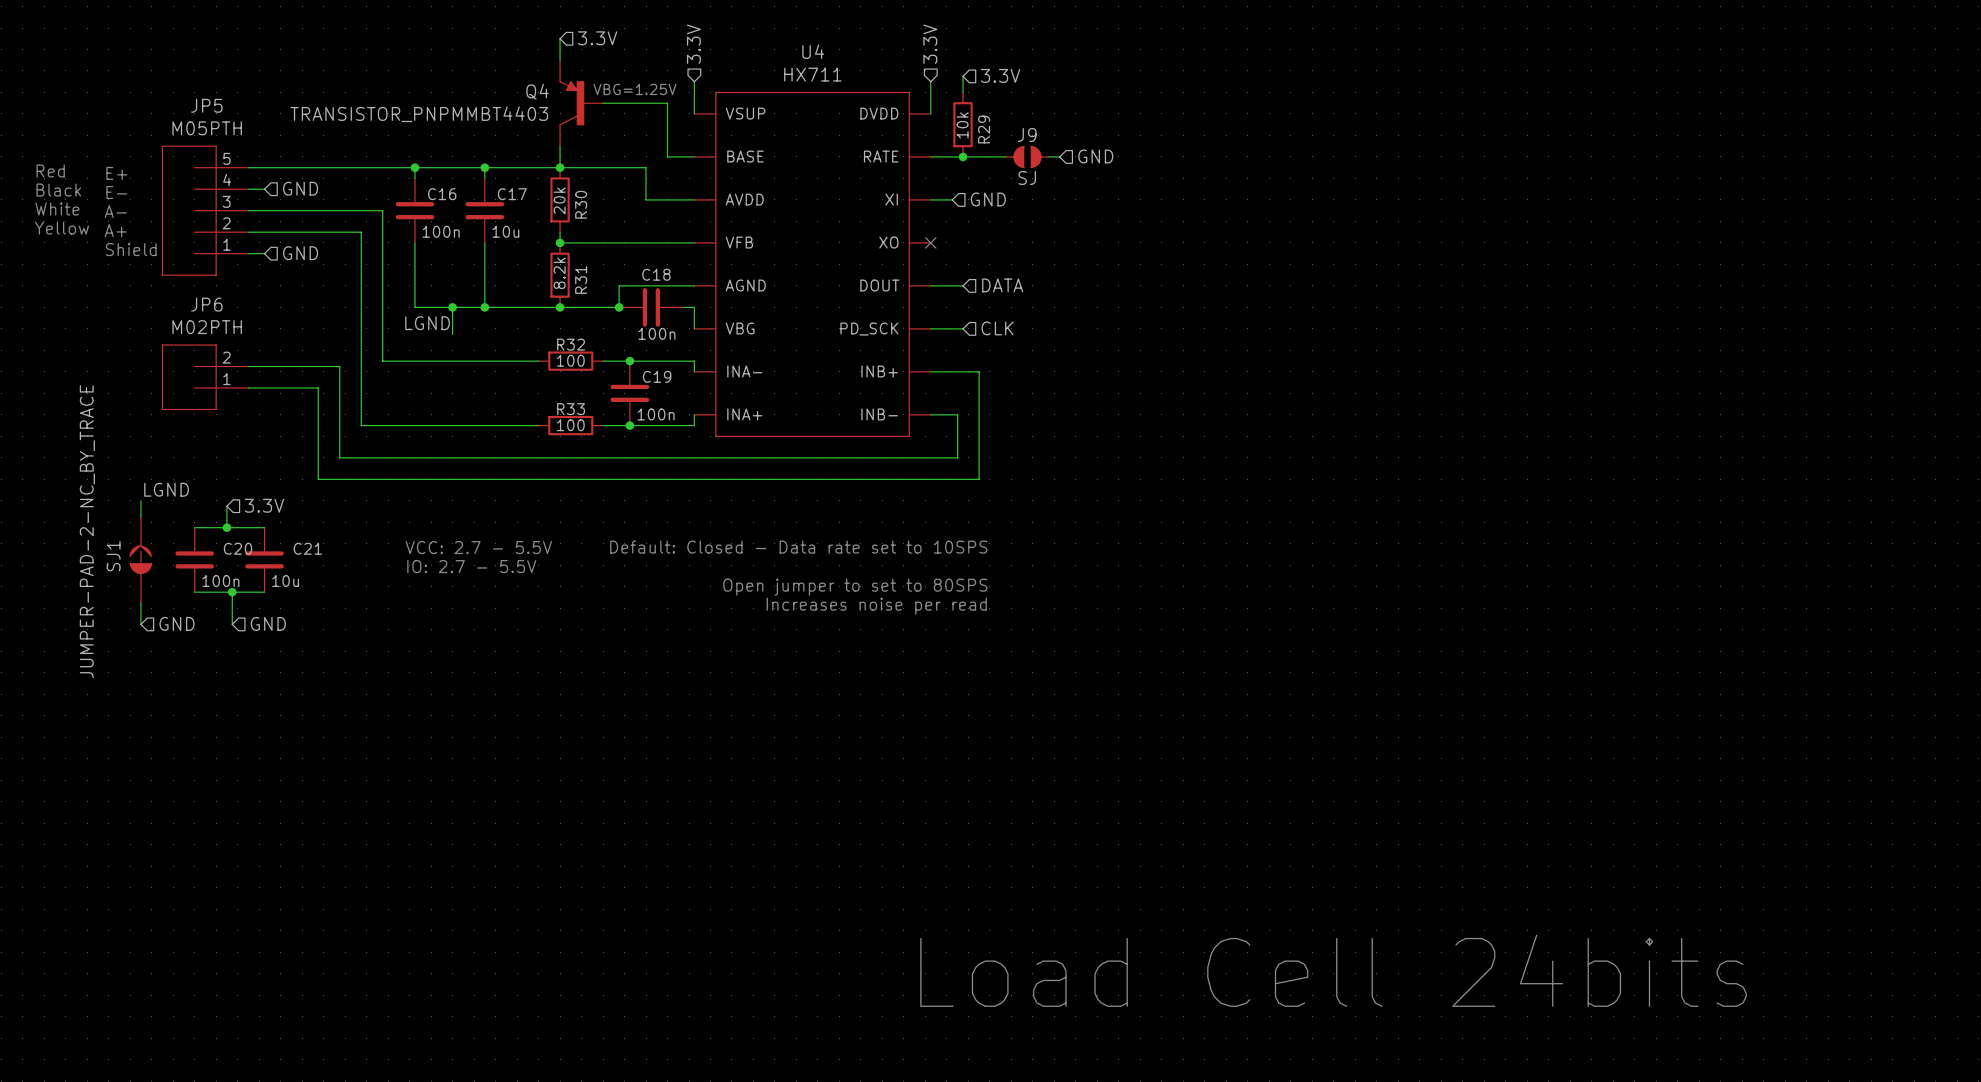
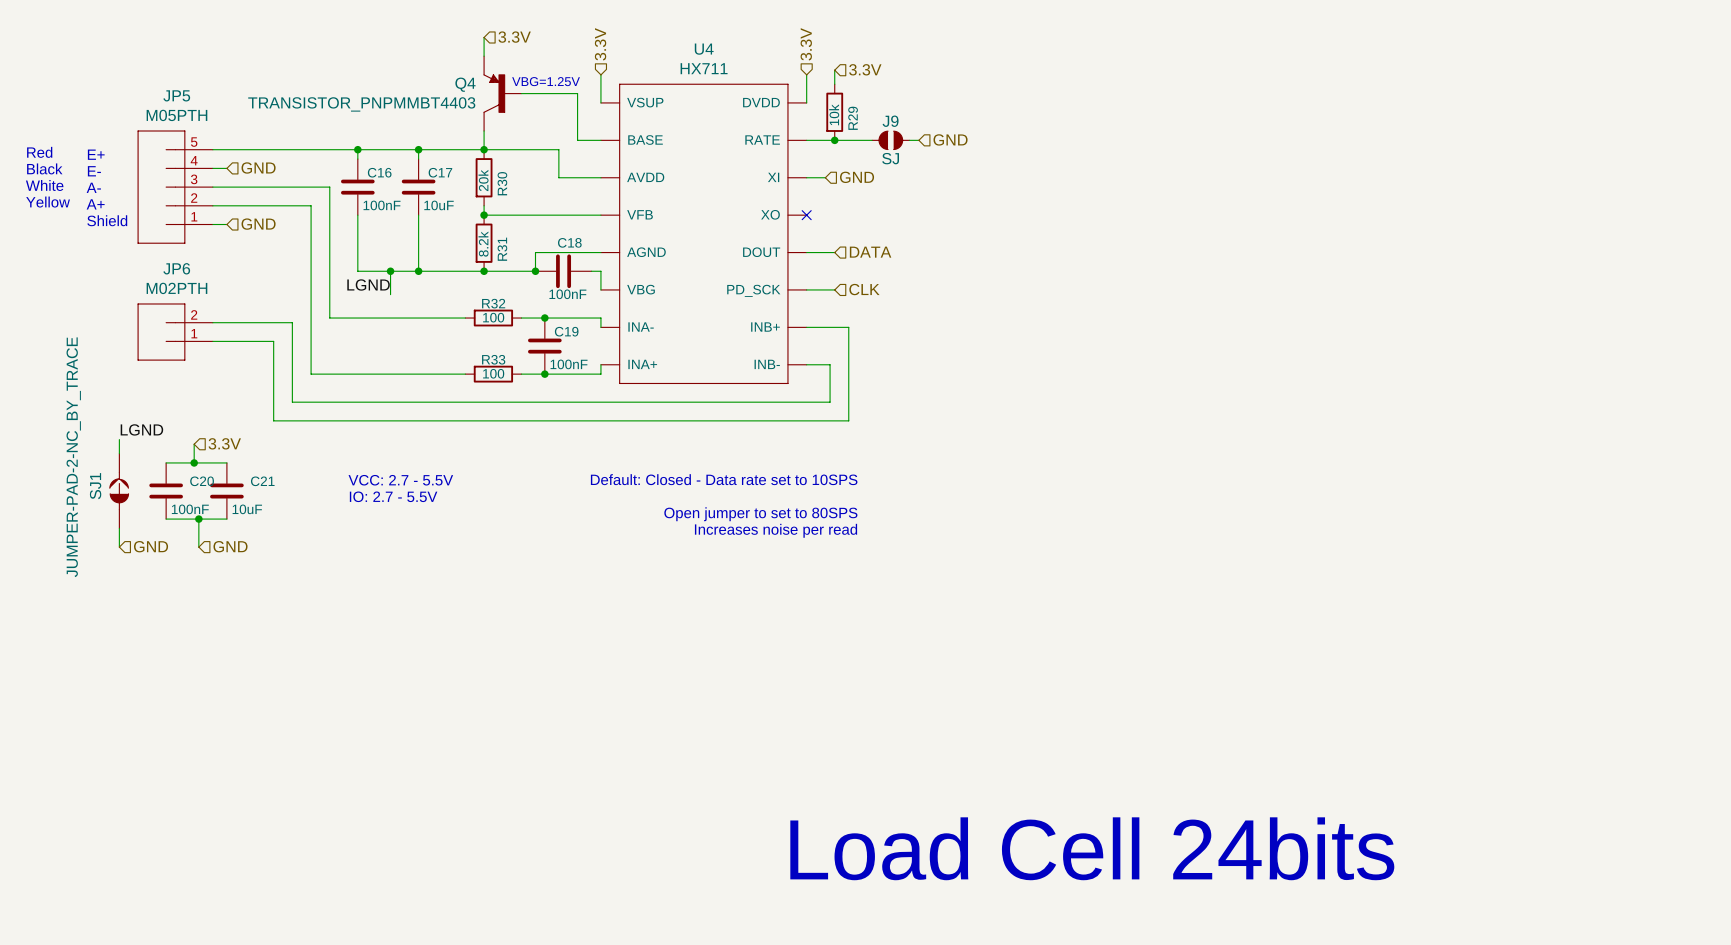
C16 value: 100n (441, 231) -> 100nF (382, 205)
C17 value: 10u (505, 231) -> 10uF (439, 205)
C18 value: 100n (656, 333) -> 100nF (567, 294)
C19 value: 100n (656, 414) -> 100nF (569, 364)
C20 value: 100n (220, 581) -> 100nF (190, 509)
C21 value: 10u (285, 581) -> 10uF (247, 509)

